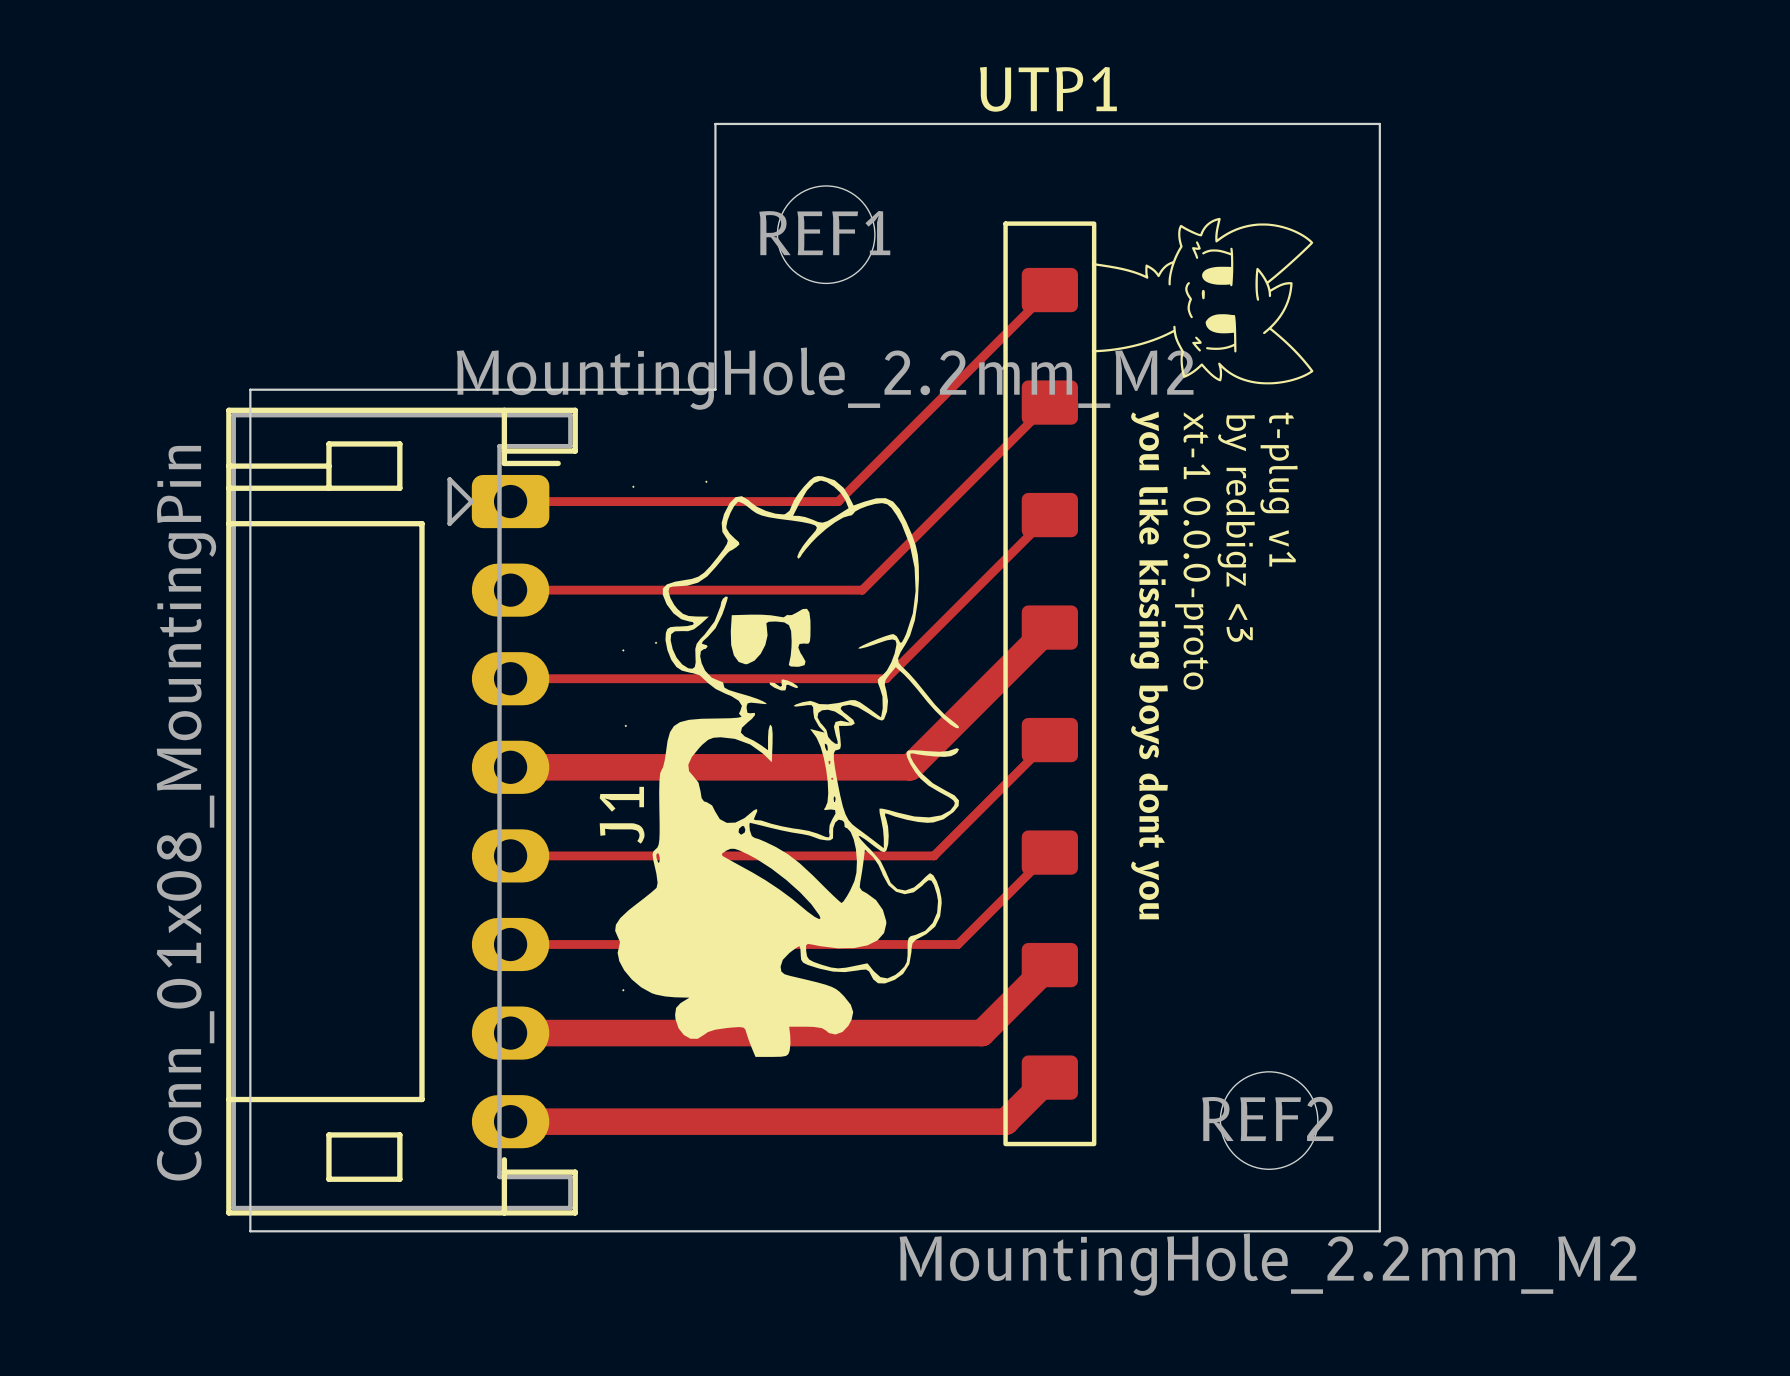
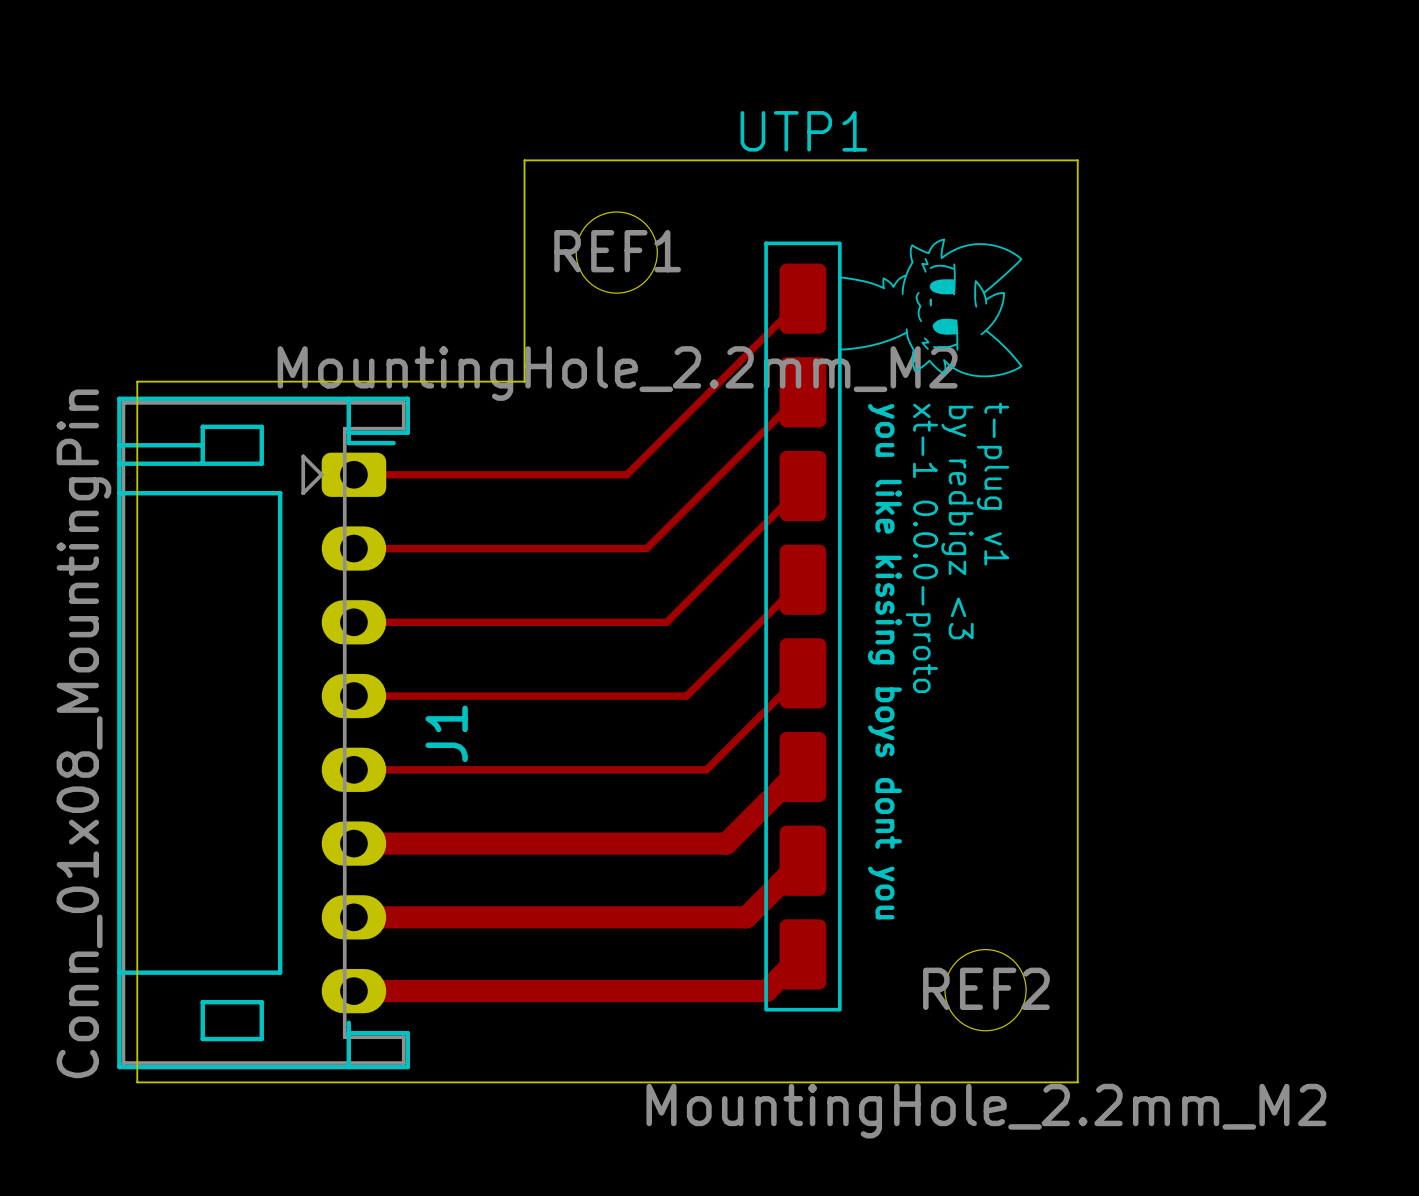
UTP1 footprint: [1003, 221, 1097, 1147] -> [764, 241, 842, 1012]
drawing: [615, 475, 960, 1057] -> none
top track width: thick (1049, 627) (910, 767) (510, 767) -> thin (802, 579) (686, 696) (353, 696)
top track width: thin (1049, 852) (957, 944) (510, 944) -> thick (802, 767) (726, 843) (353, 843)

